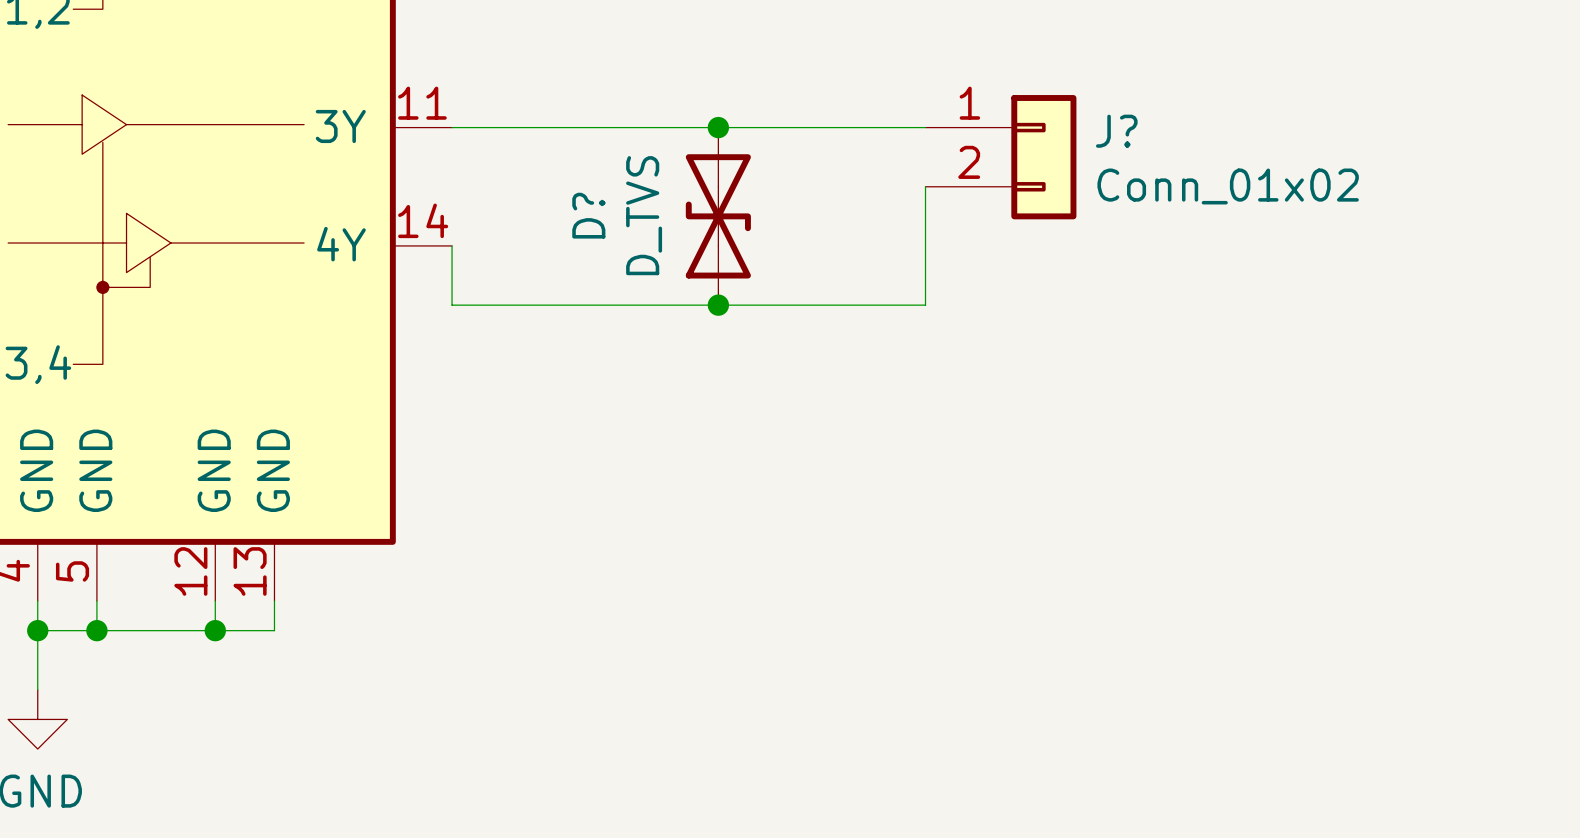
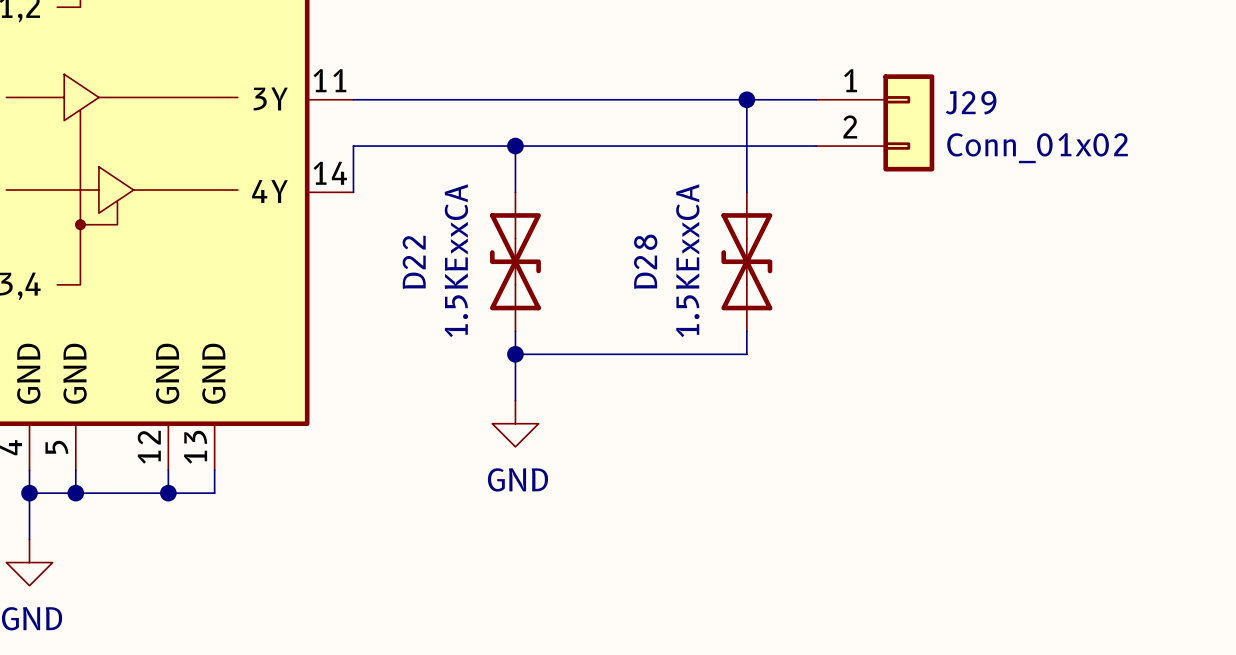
junction: (718, 127) -> none
wire: none -> (746, 99) (746, 192)
junction: none -> (746, 99)
J?: Conn_01x02 (1000, 157) -> none
J29: none -> Conn_01x02 (875, 122)
wire: none -> (515, 146) (515, 192)
junction: none -> (515, 146)
wire: (925, 186) (925, 305) (452, 305) (452, 245) -> (816, 146) (353, 146) (353, 192)
D?: D_TVS (718, 216) -> none
junction: (718, 305) -> none
D22: none -> 1.5KExxCA (515, 261)
D28: none -> 1.5KExxCA (746, 261)
wire: none -> (515, 331) (515, 400)
wire: none -> (746, 331) (746, 354) (515, 354)
junction: none -> (515, 354)
power symbol: none -> GND (515, 423)

